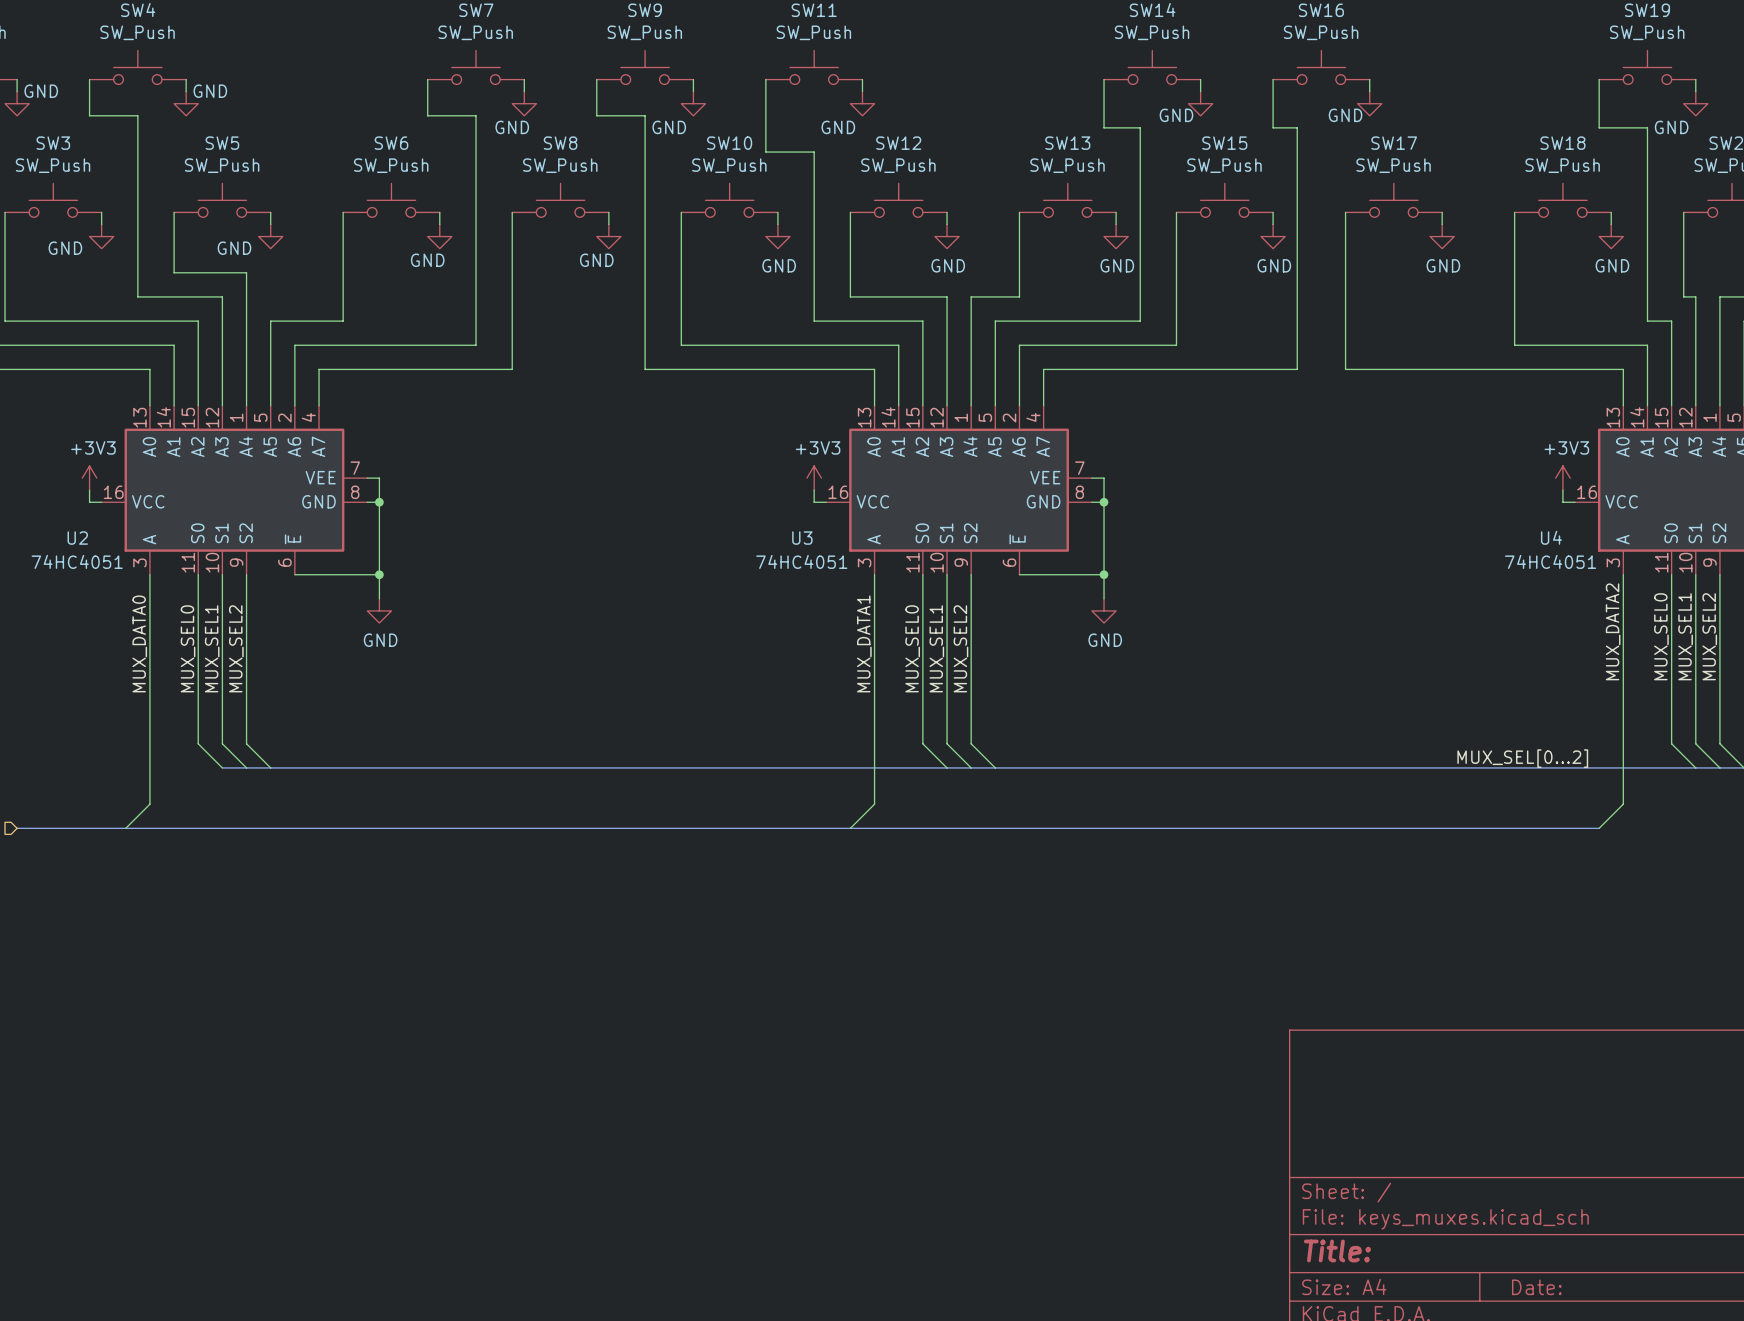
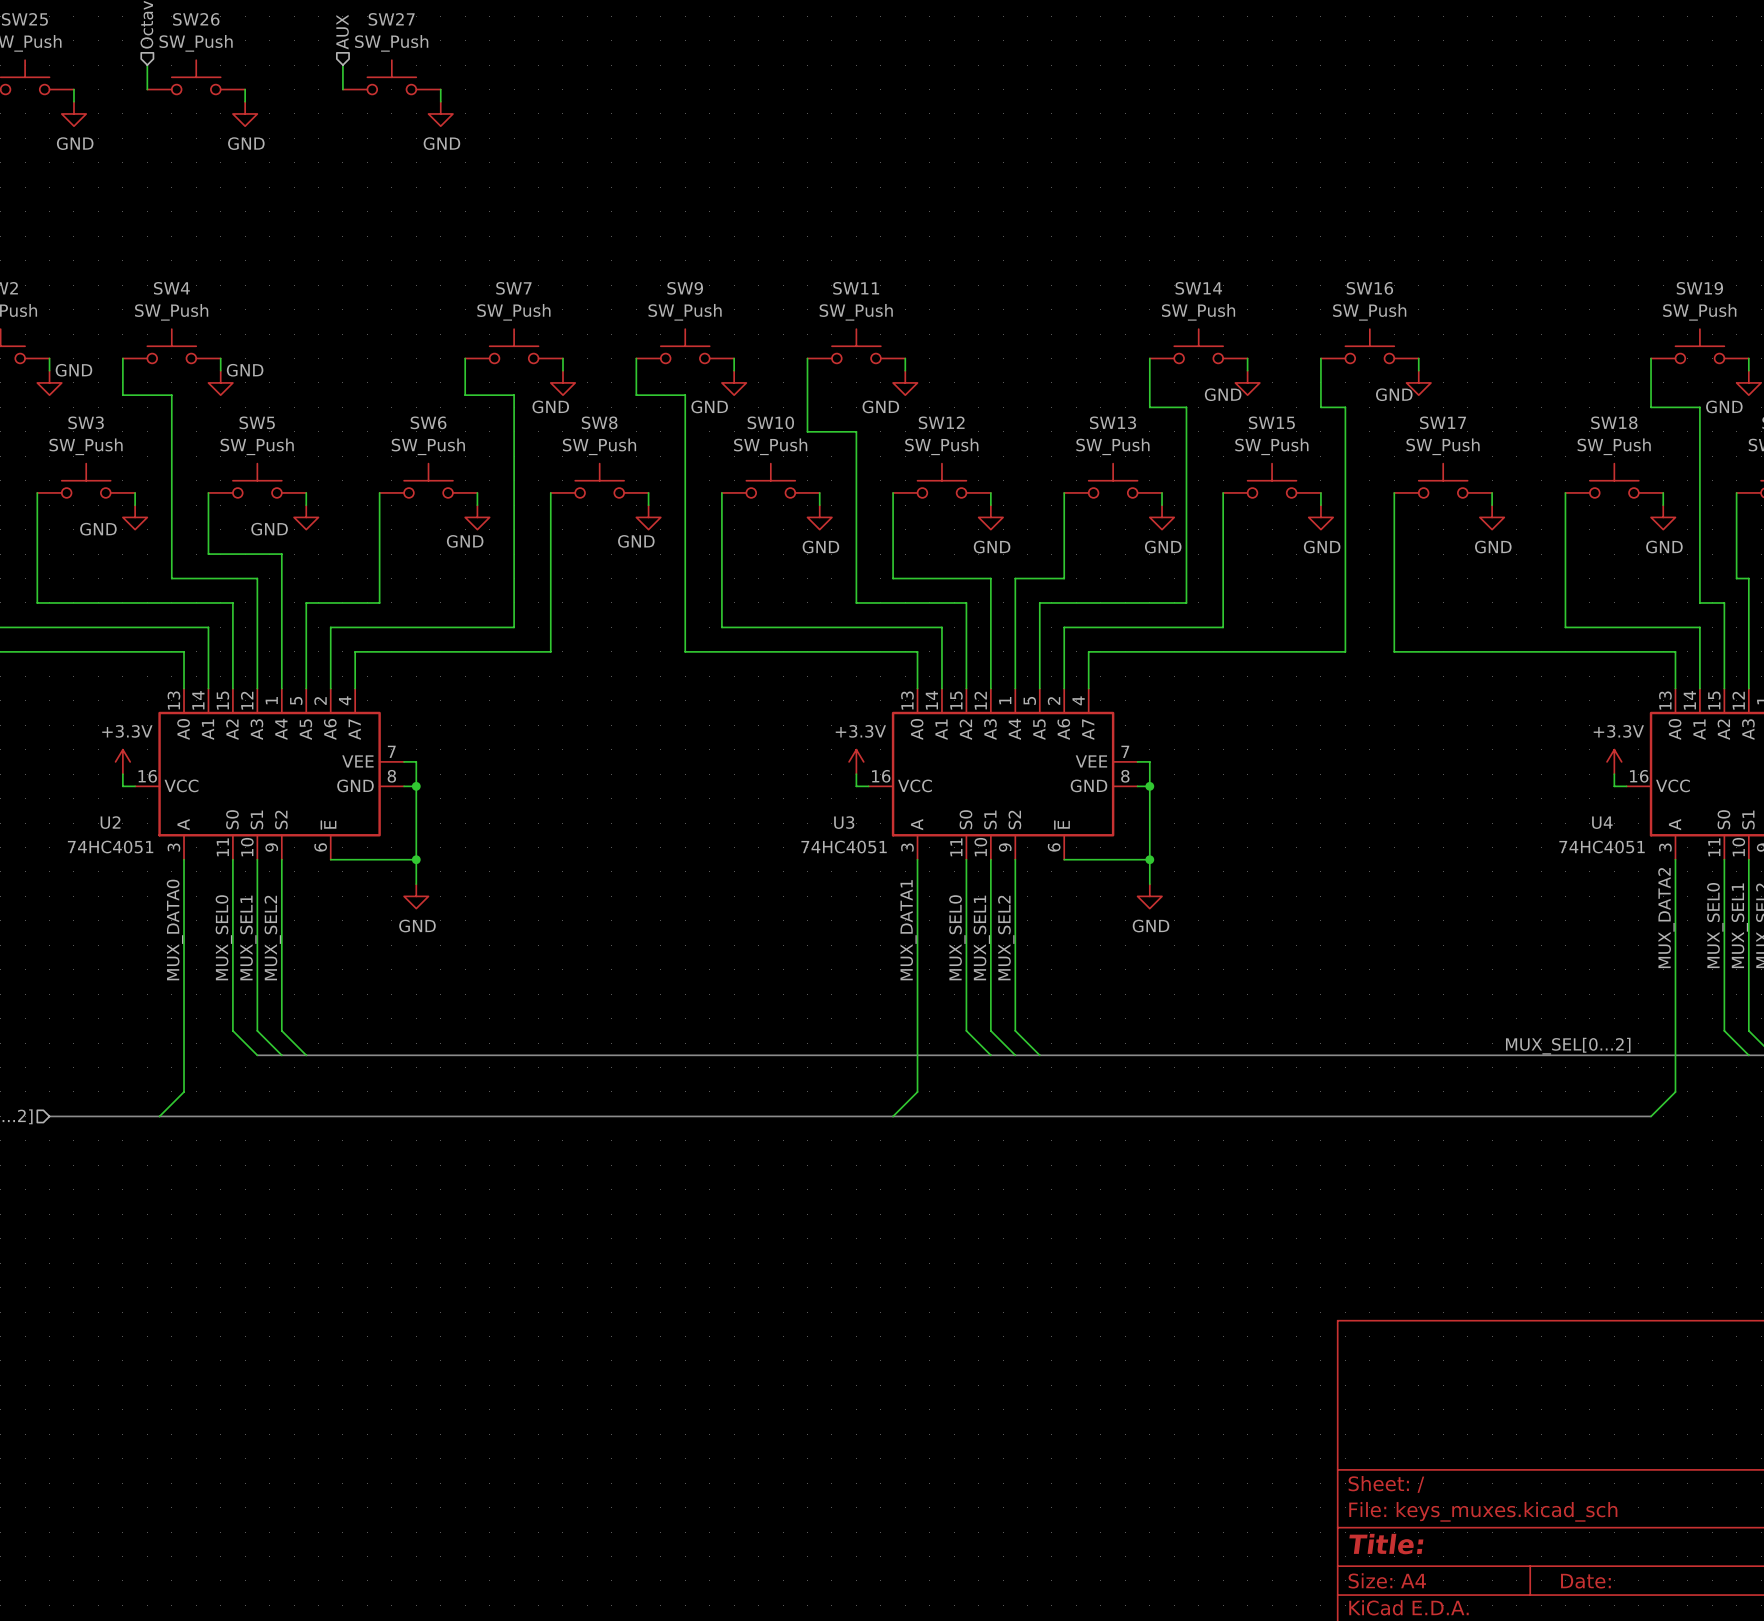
power symbol: +3V3 (89, 478) -> +3.3V (122, 761)
power symbol: +3V3 (814, 478) -> +3.3V (856, 761)
power symbol: +3V3 (1562, 478) -> +3.3V (1614, 761)

